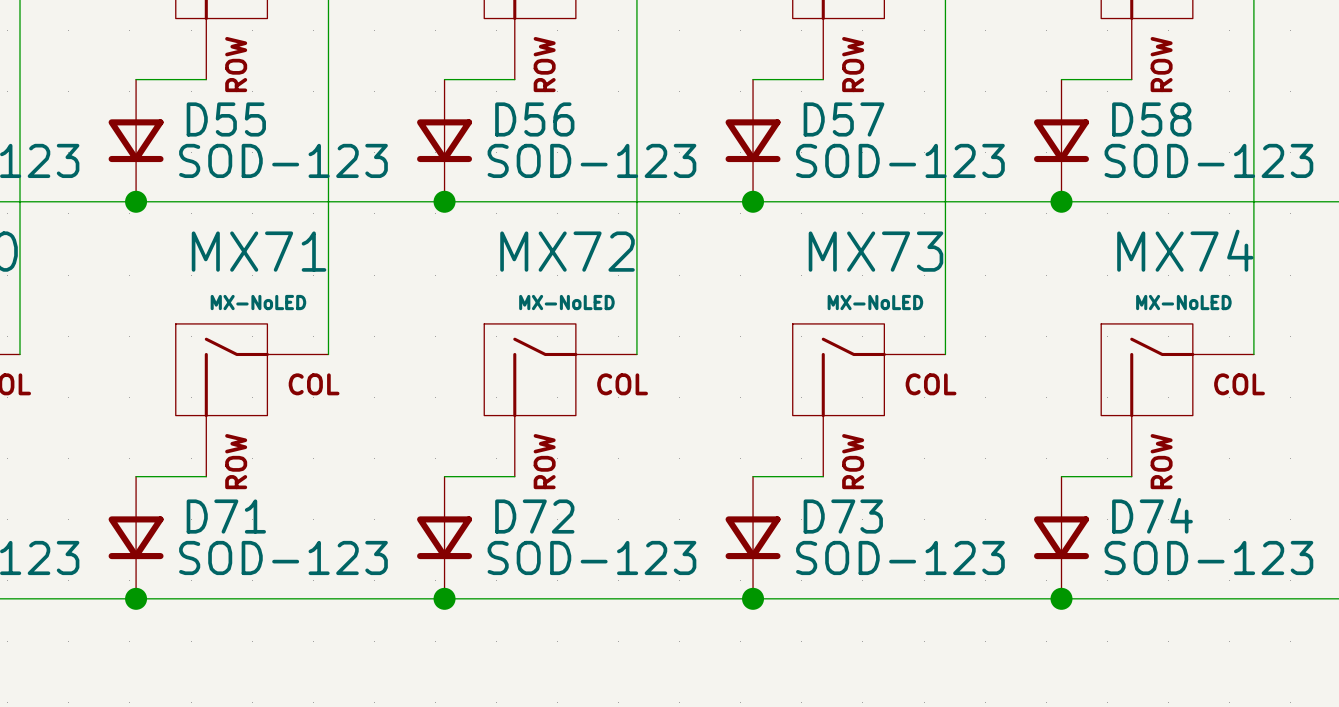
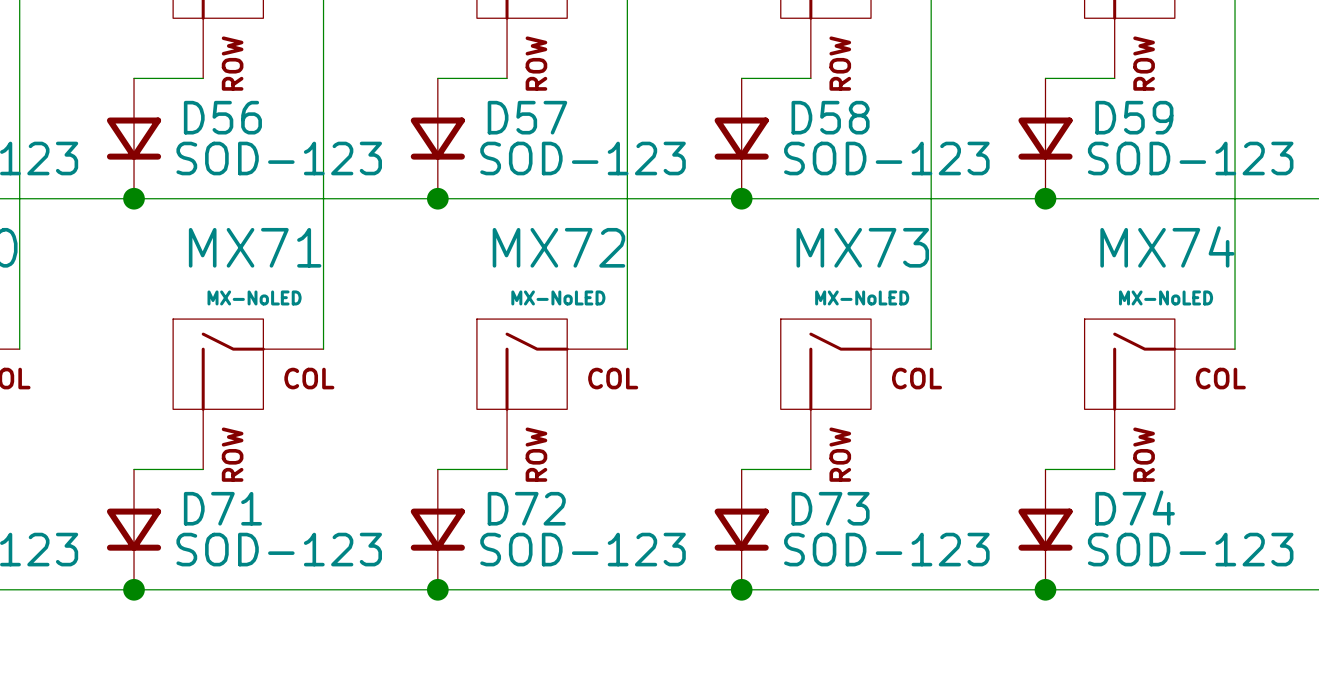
D55 name: D55 (226, 119) -> D56 (222, 117)
D56 name: D56 (534, 119) -> D57 (527, 117)
D57 name: D57 (844, 119) -> D58 (830, 117)
D58 name: D58 (1151, 119) -> D59 (1134, 117)

